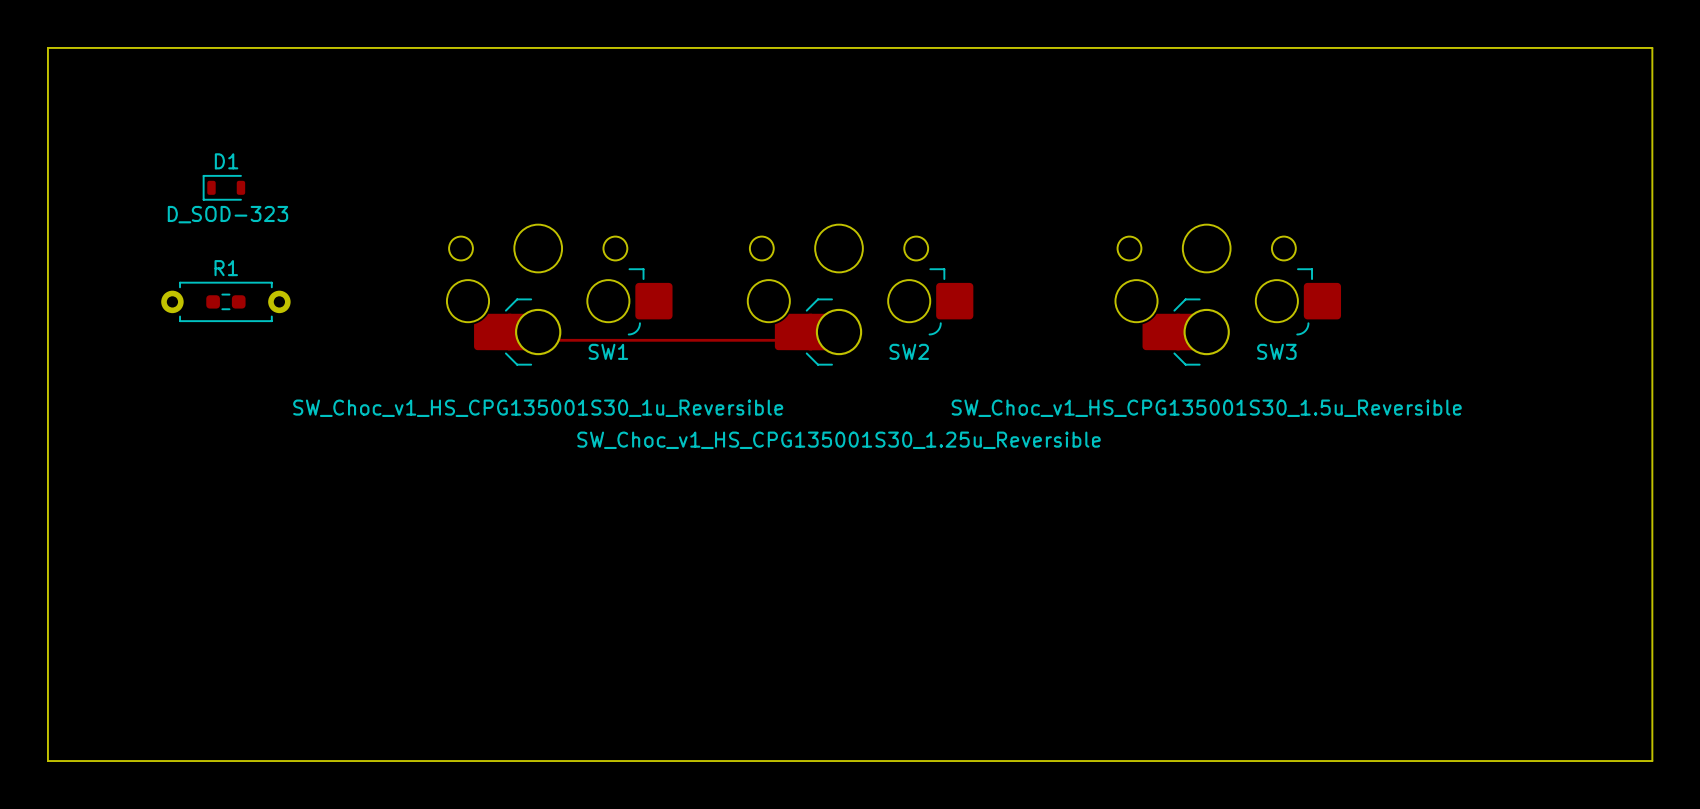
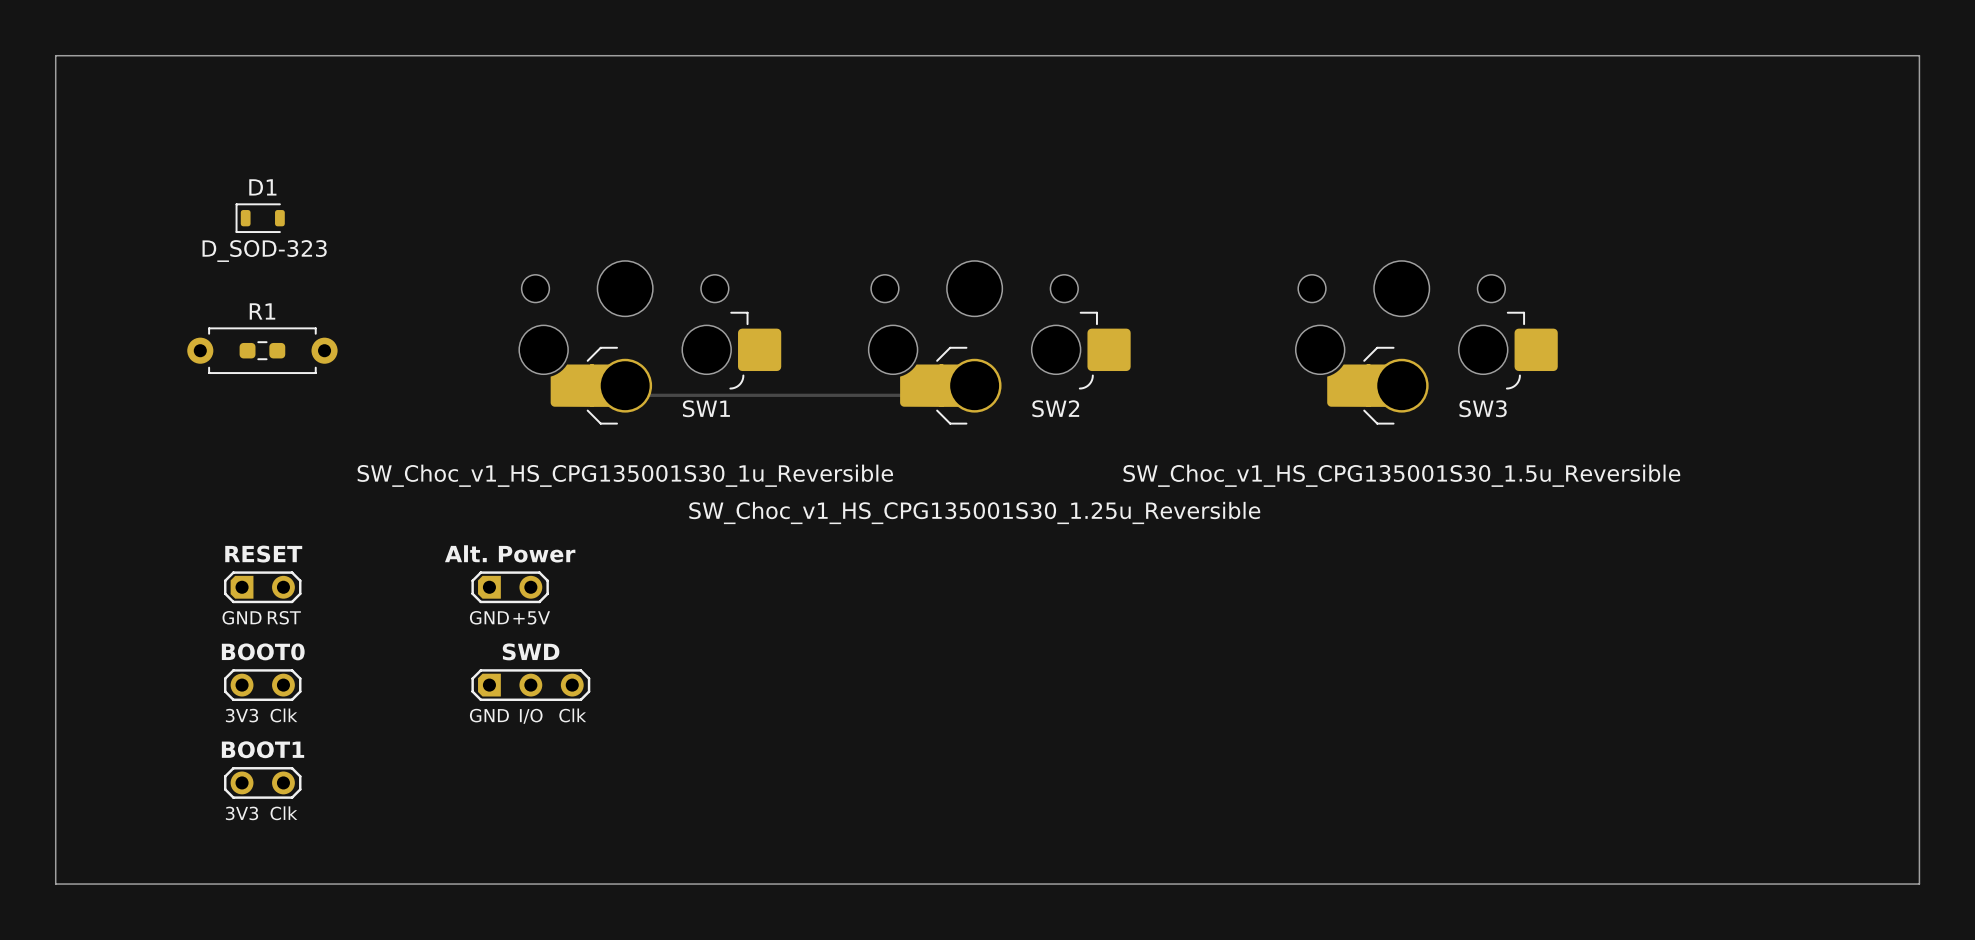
part: none -> RESET (262, 587)
part: none -> Alt. Power (510, 587)
part: none -> BOOT0 (262, 685)
part: none -> SWD (530, 685)
part: none -> BOOT1 (262, 782)

